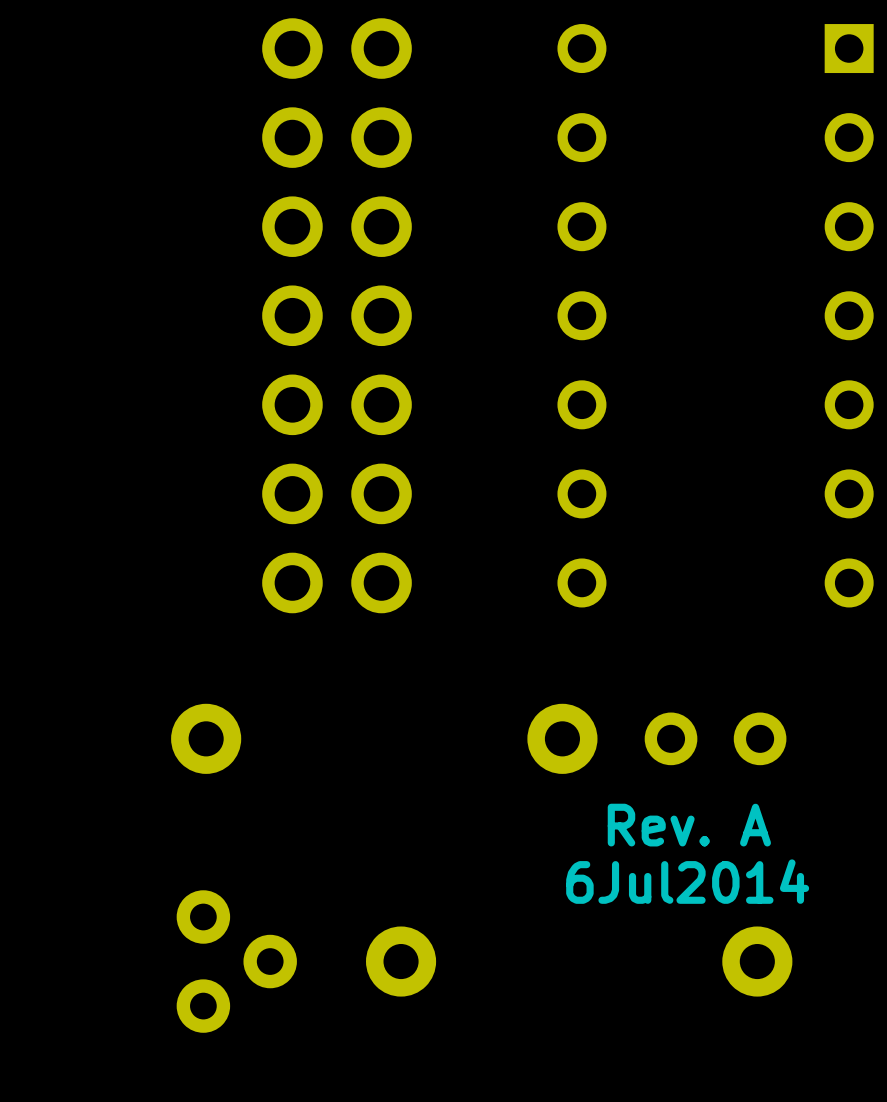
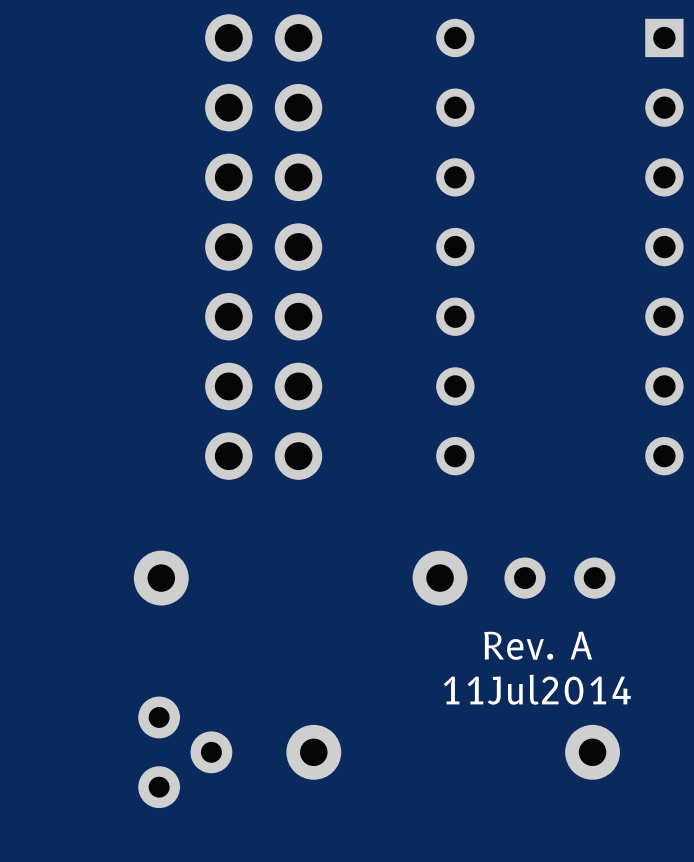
text: 6Jul2014 (687, 881) -> 11Jul2014 (537, 689)

